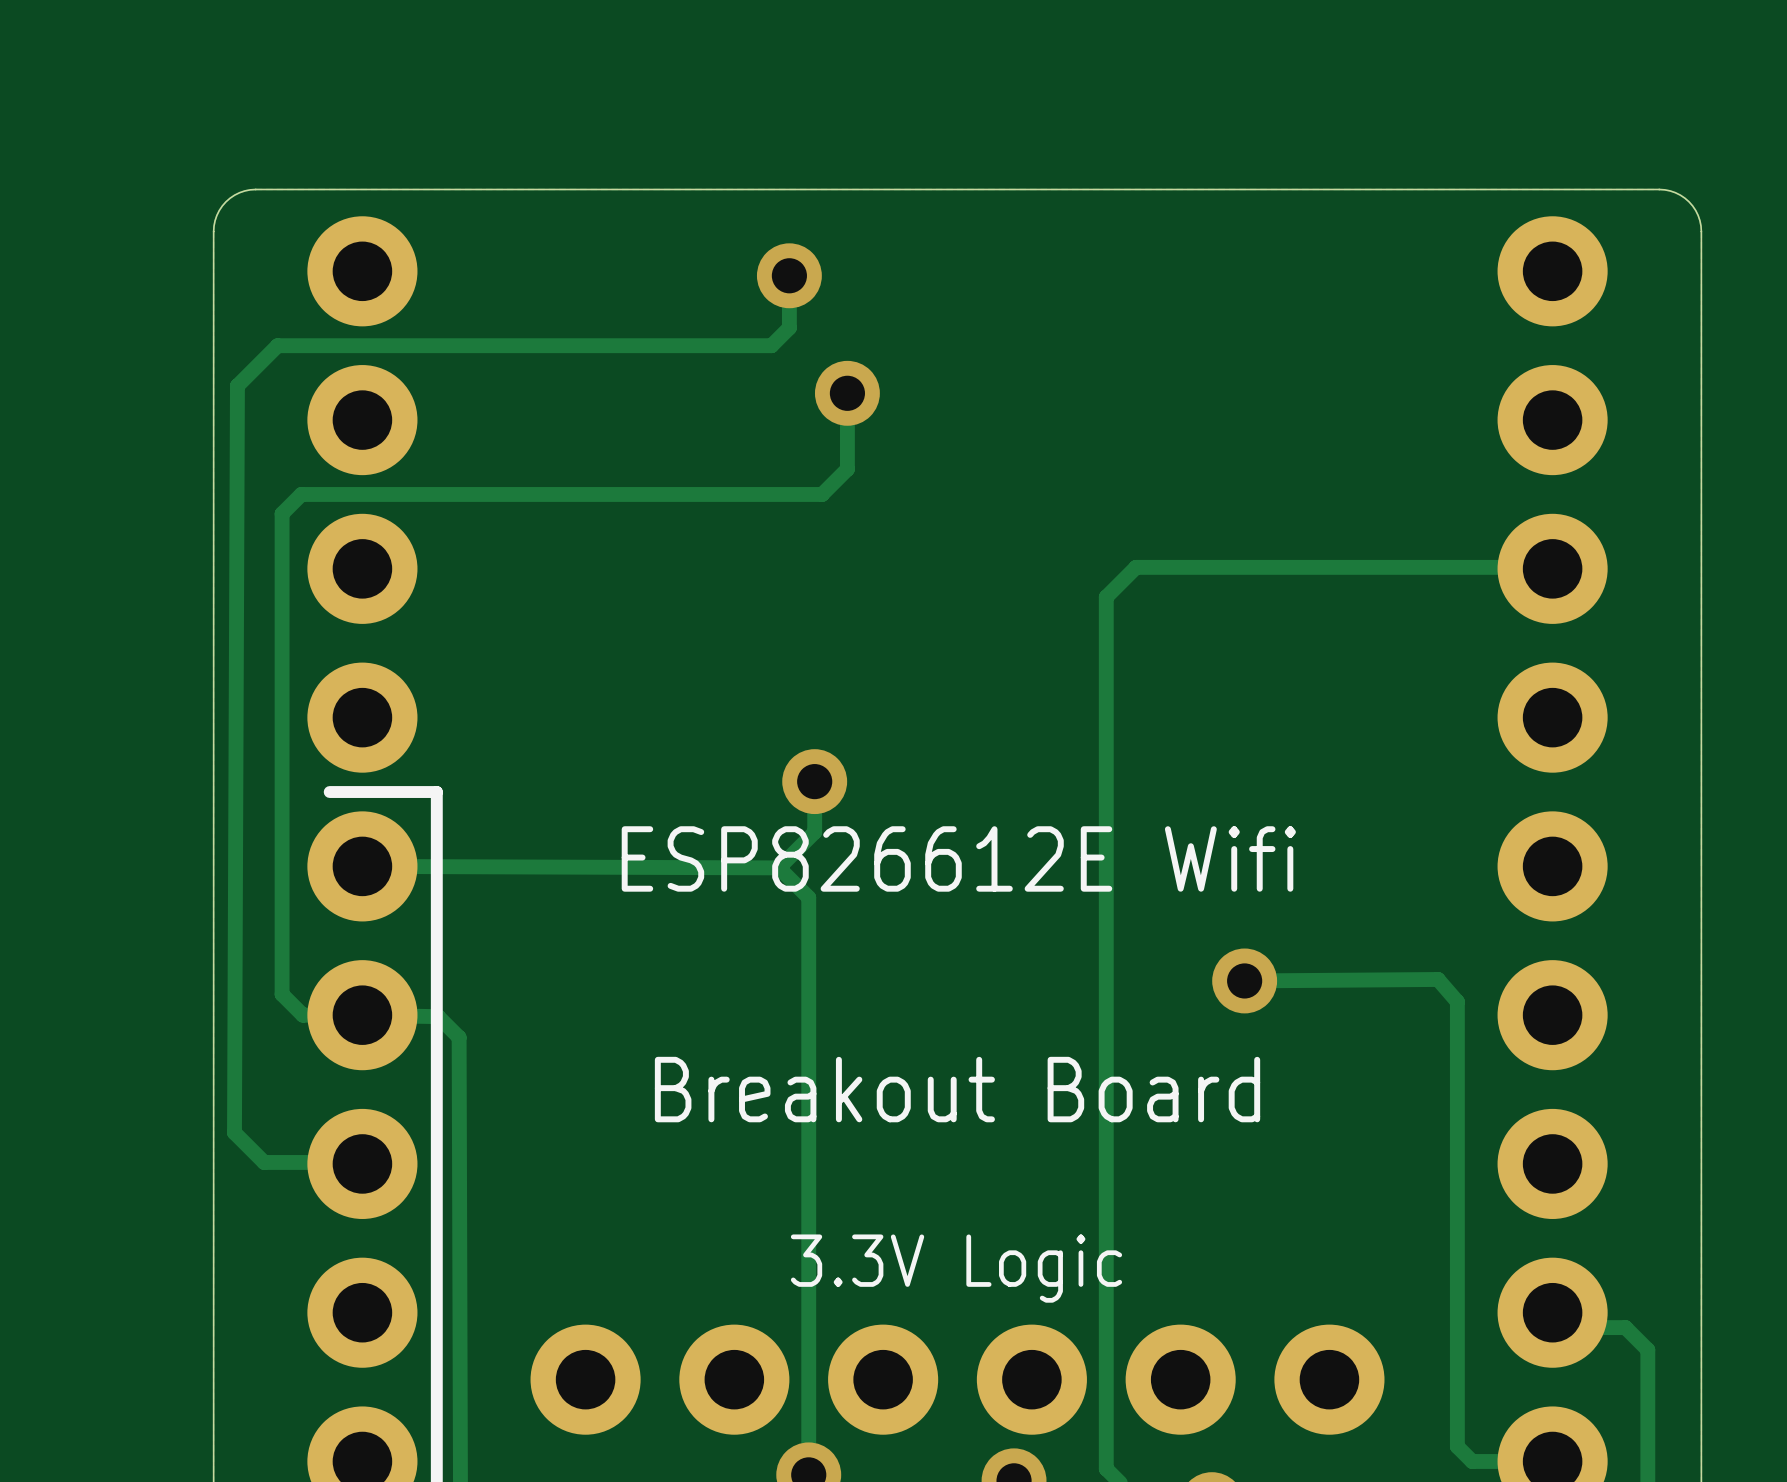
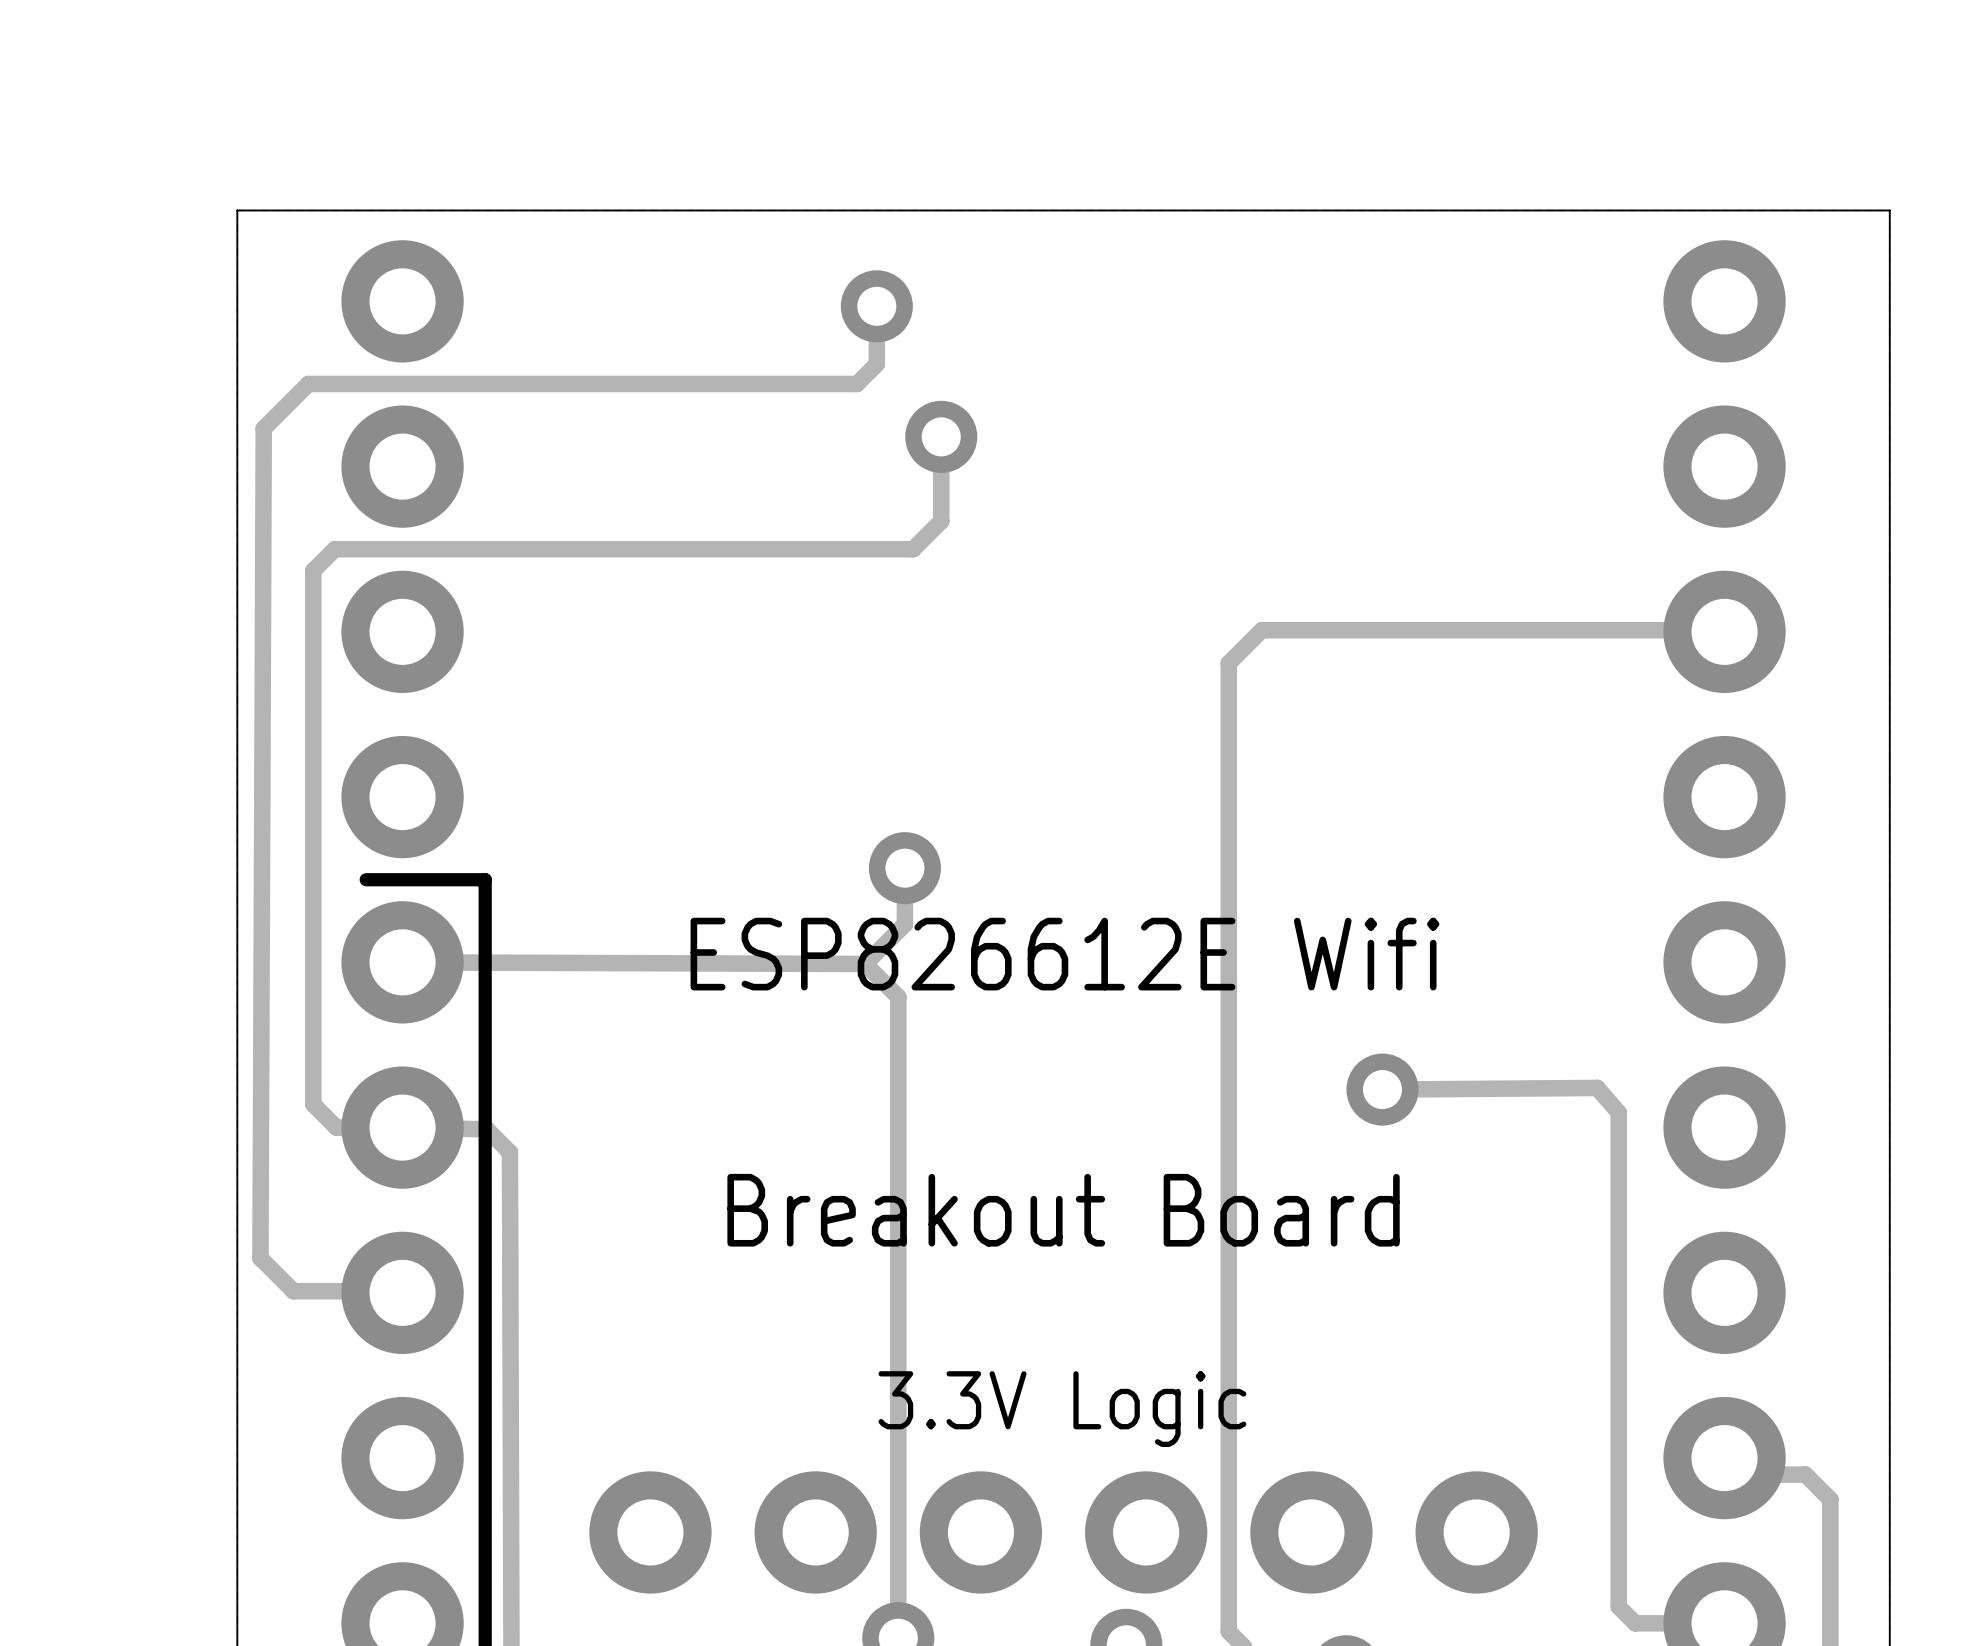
board edge: (255, 189) (239, 192) (225, 201) (216, 215) (213, 231) -> (284, 210) (237, 210) (237, 257)
board edge: (1659, 189) (1675, 192) (1689, 201) (1698, 215) (1701, 231) -> (1843, 210) (1889, 210) (1889, 257)

